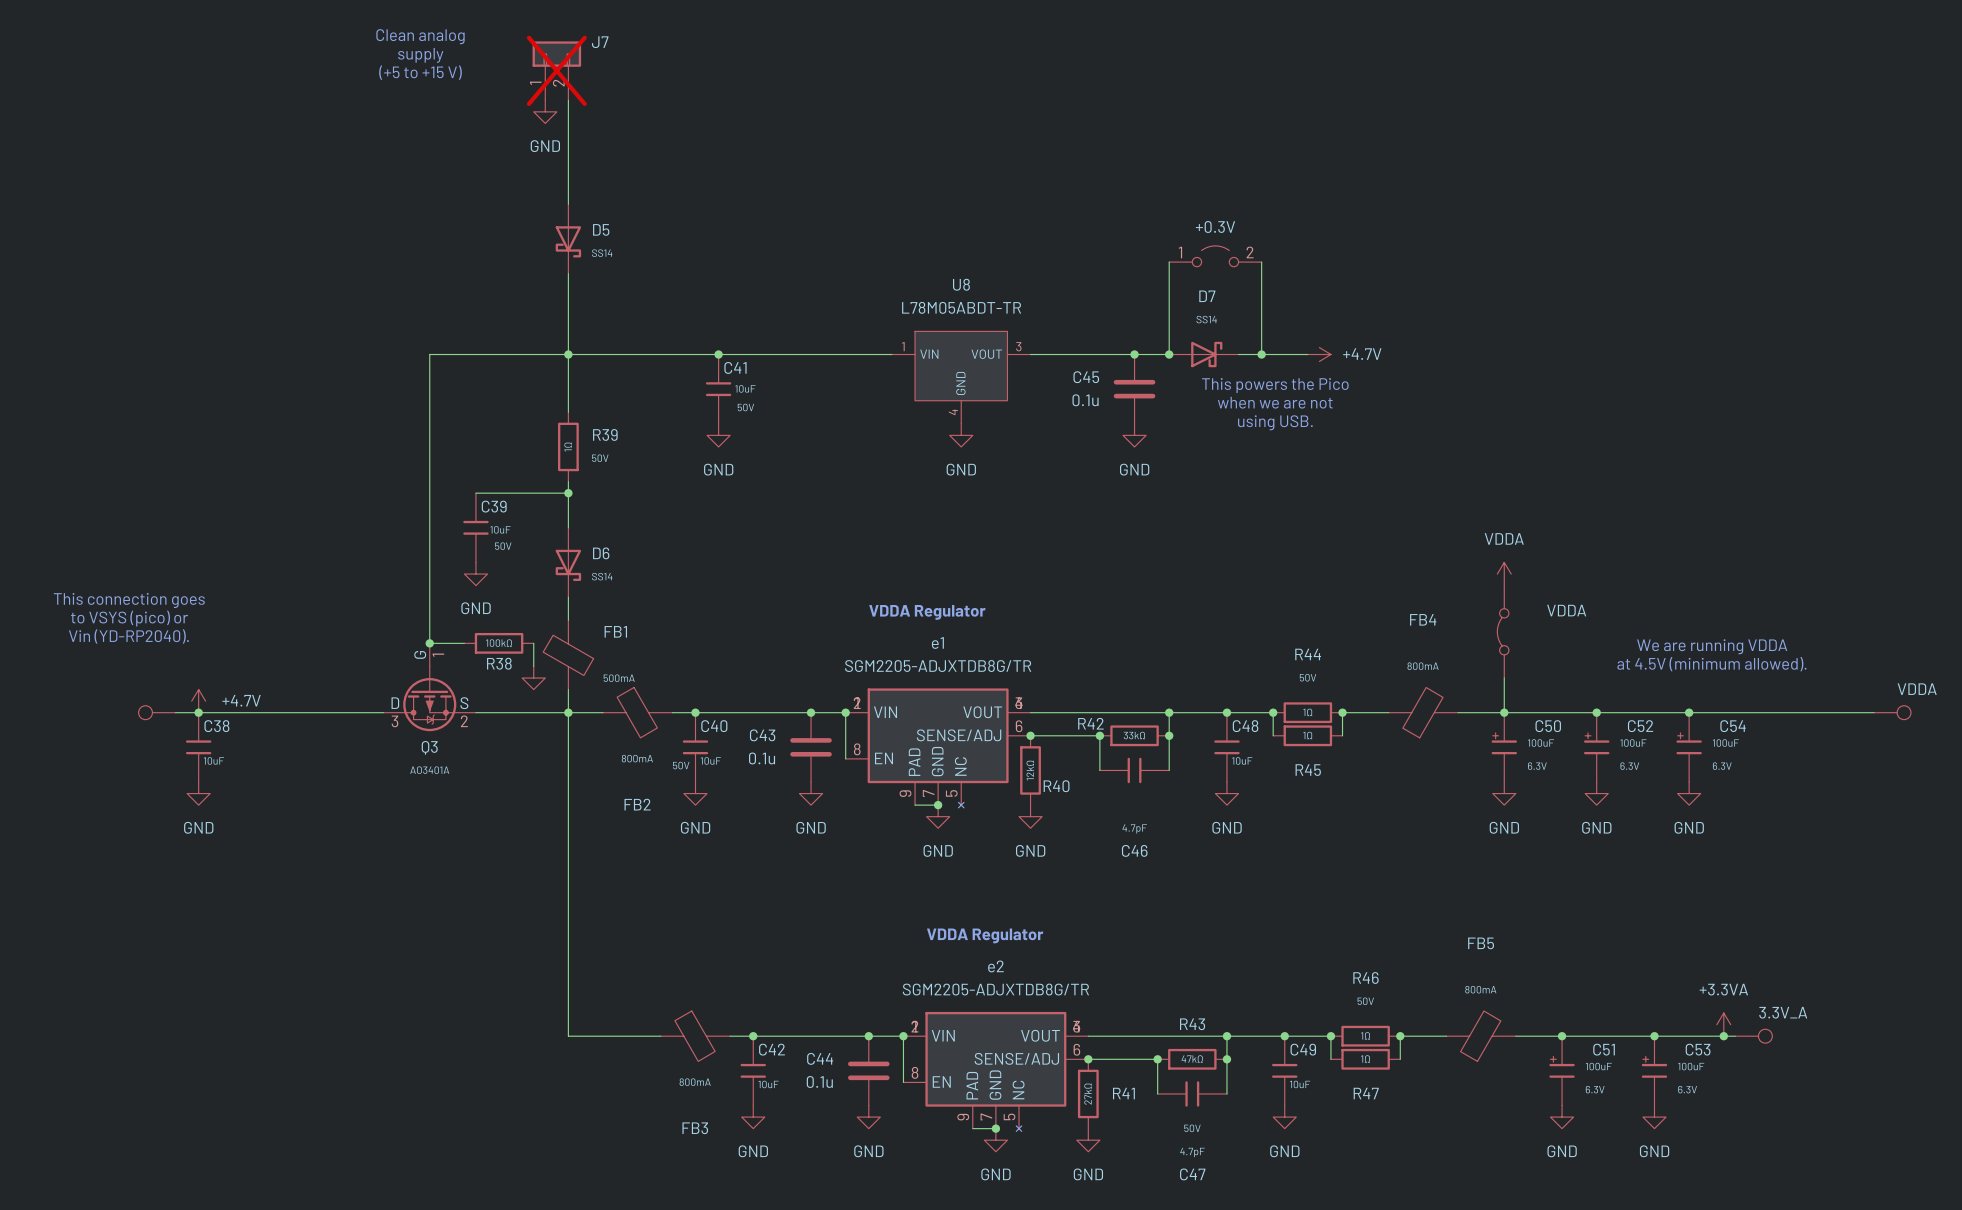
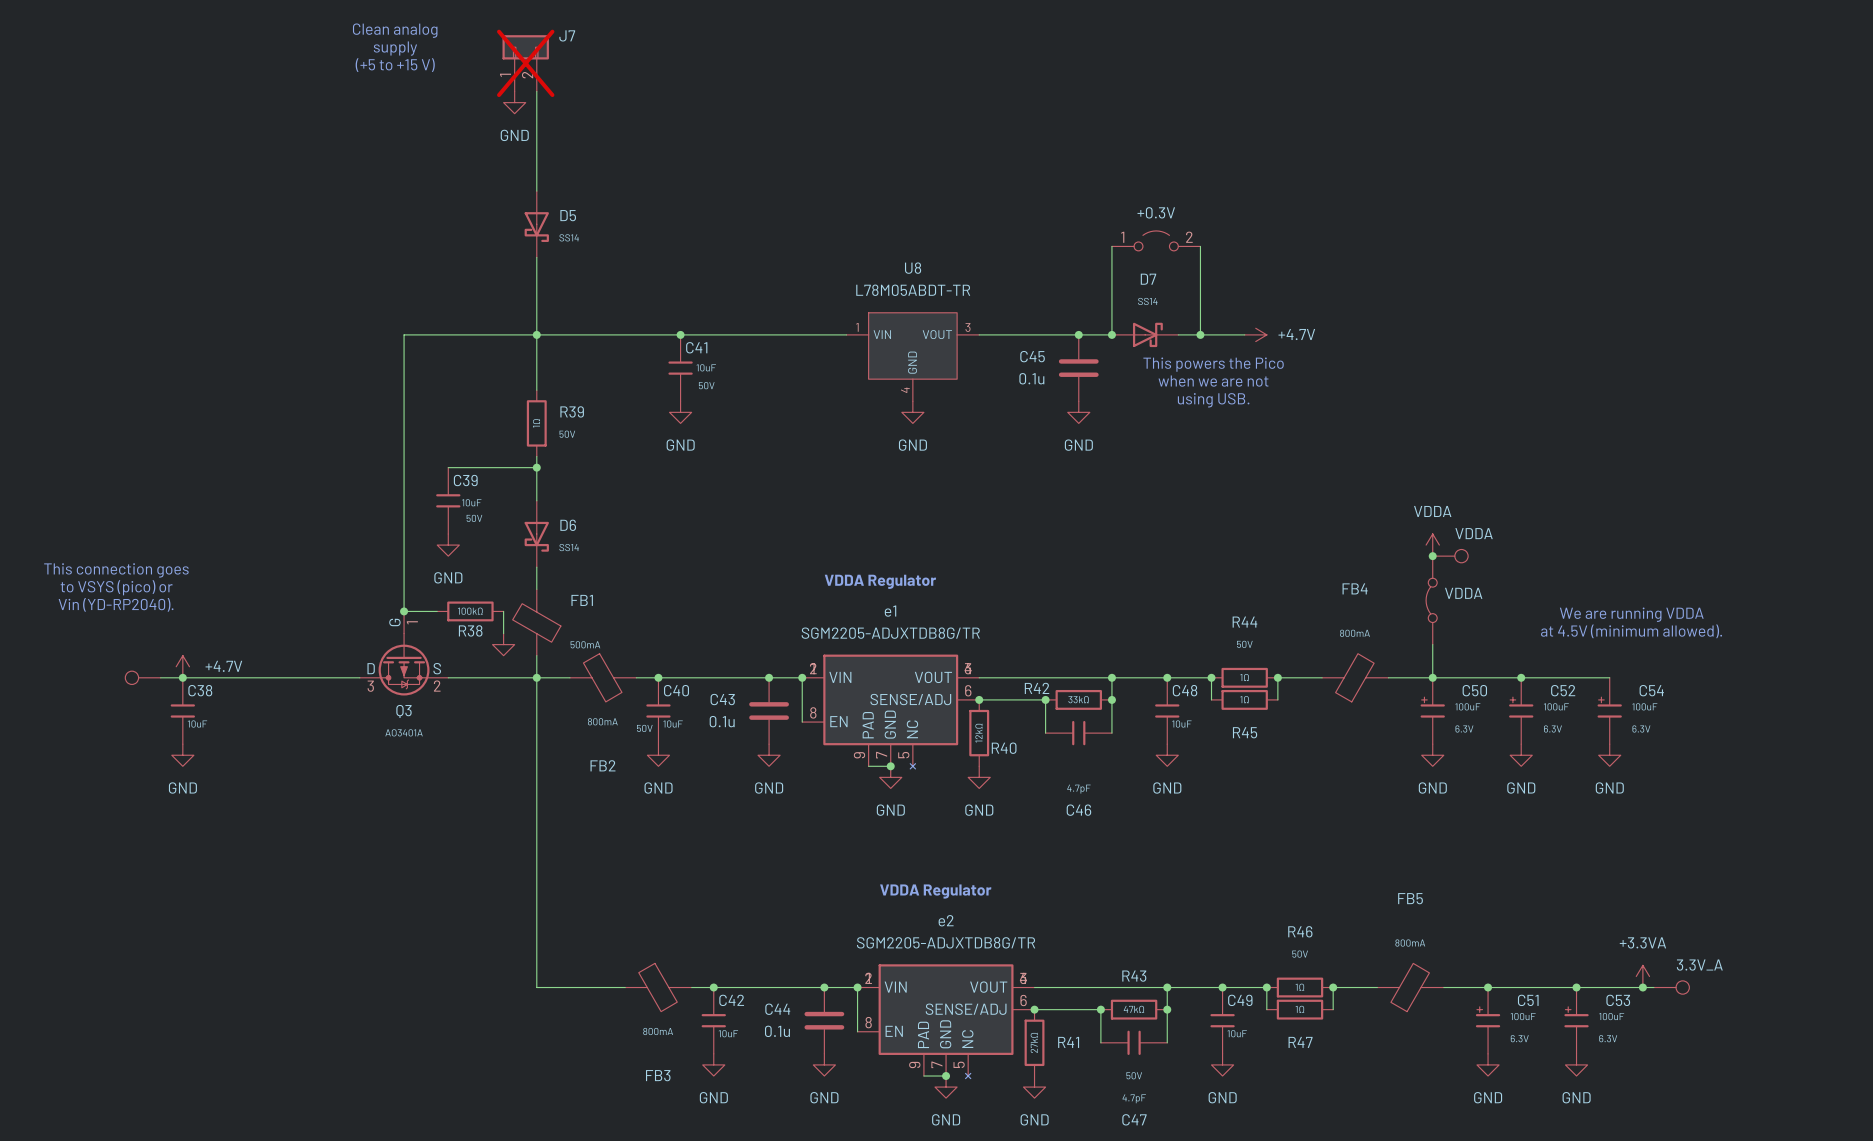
junction: none -> (1432, 556)
part: none -> VDDA (1450, 556)
part value position: VDDA (1566, 610) -> VDDA (1463, 593)
wire: (1689, 712) (1874, 712) -> none
junction: (1689, 712) -> none
part: VDDA (1892, 712) -> none

